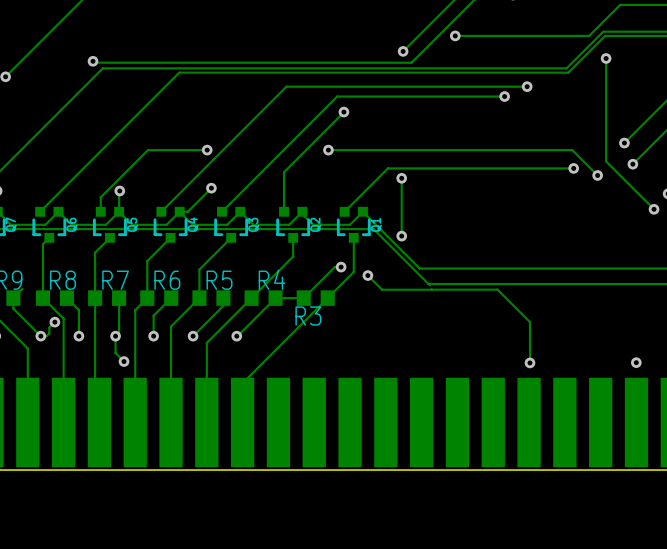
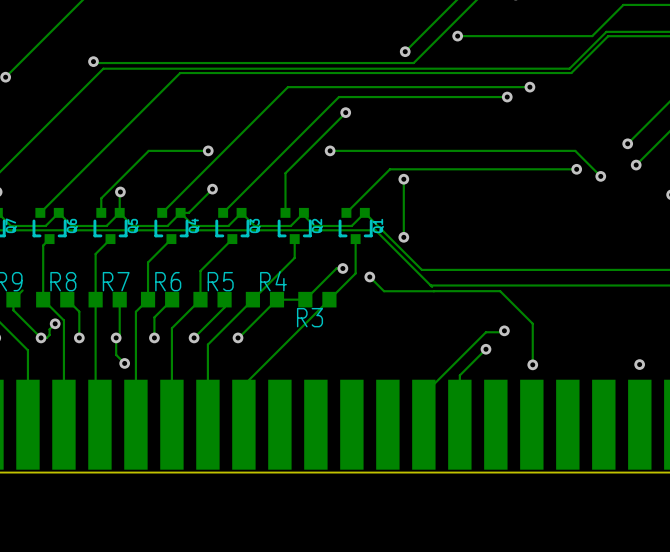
track: (606, 58) (606, 161) (654, 209) -> none
via: (606, 58) -> none
via: (654, 209) -> none
track: none -> (504, 330) (485, 332) (423, 394) (423, 424)
via: none -> (504, 330)
track: none -> (485, 349) (459, 375) (459, 424)
via: none -> (485, 349)

